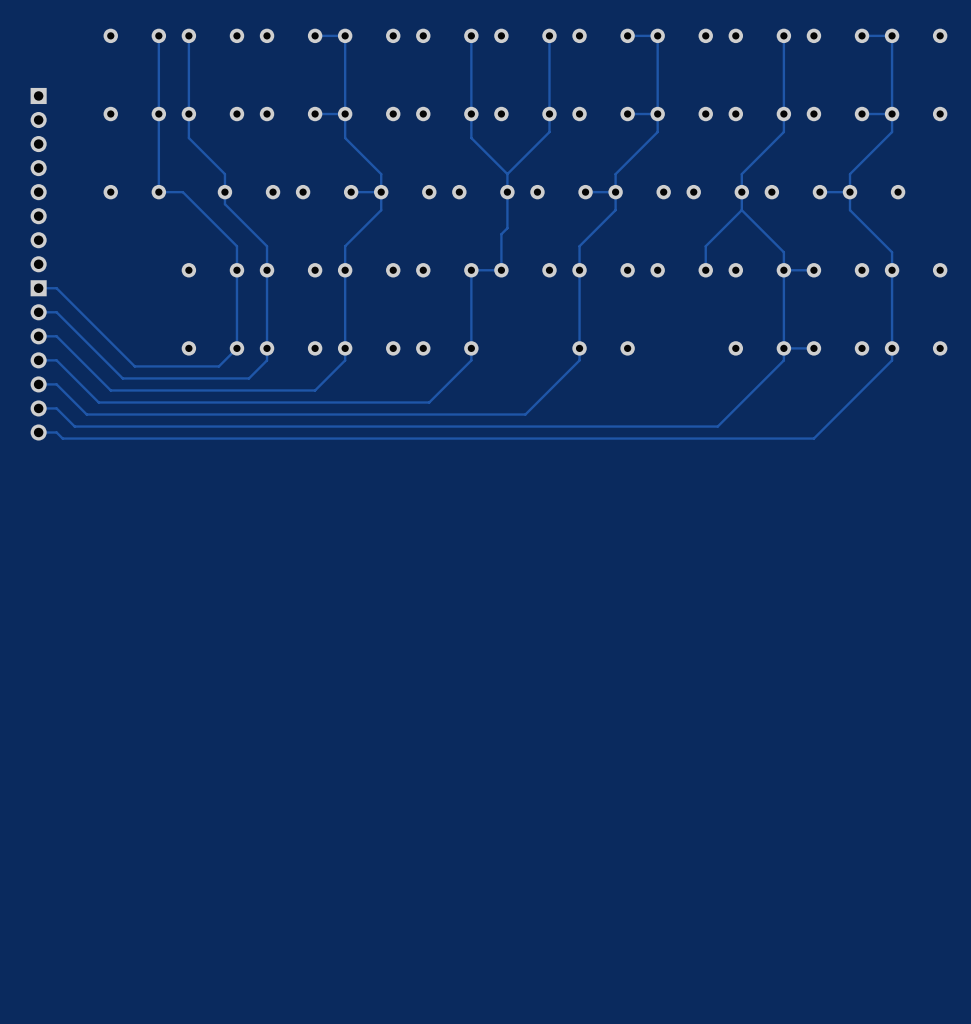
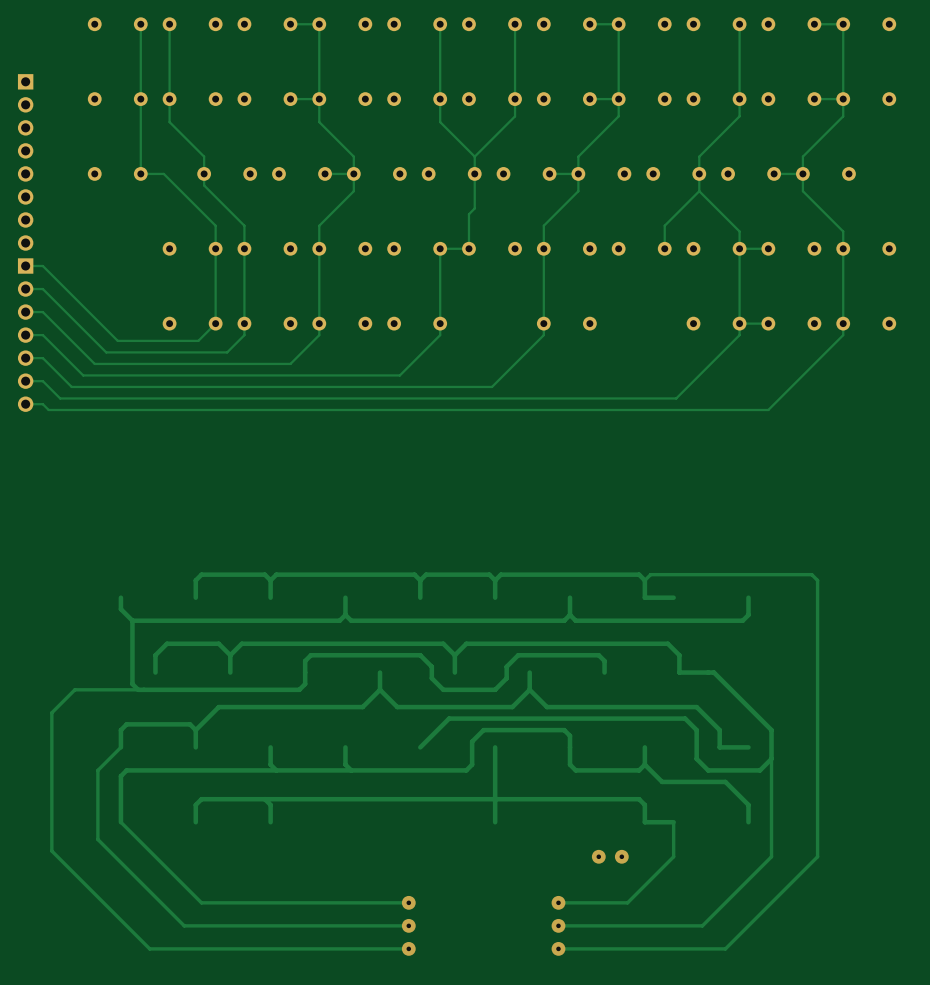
track: none -> (270, 580) (264, 574) (201, 574) (195, 580) (195, 597)
track: none -> (270, 580) (270, 597)
track: none -> (420, 580) (420, 597)
track: none -> (420, 580) (414, 574) (276, 574) (270, 580)
track: none -> (495, 580) (495, 597)
track: none -> (495, 580) (489, 574) (426, 574) (420, 580)
track: none -> (644, 580) (639, 574) (500, 574) (495, 580)
track: none -> (644, 580) (644, 597) (673, 597)
track: none -> (644, 580) (650, 574) (811, 574) (817, 580) (817, 856) (725, 948) (558, 948)
track: none -> (120, 597) (120, 609) (132, 620)
track: none -> (345, 597) (345, 614)
track: none -> (570, 597) (570, 614)
track: none -> (748, 597) (748, 614) (742, 620) (575, 620) (570, 614)
track: none -> (345, 614) (339, 620) (132, 620)
track: none -> (570, 614) (564, 620) (351, 620) (345, 614)
track: none -> (132, 620) (132, 684) (138, 689) (299, 689) (305, 684) (305, 661) (310, 655) (420, 655) (431, 666) (431, 678) (443, 689) (495, 689) (506, 678) (506, 666) (518, 655) (598, 655) (604, 661) (604, 672)
track: none -> (230, 655) (218, 643) (166, 643) (155, 655) (155, 672)
track: none -> (230, 655) (230, 672)
track: none -> (454, 655) (454, 672)
track: none -> (454, 655) (466, 643) (667, 643) (679, 655) (679, 672) (713, 672) (771, 730) (771, 758)
track: none -> (454, 655) (443, 643) (241, 643) (230, 655)
track: none -> (380, 672) (380, 689)
track: none -> (529, 672) (529, 689)
track: none -> (143, 689) (74, 689) (51, 712) (51, 851) (149, 948) (408, 948)
track: none -> (380, 689) (362, 707) (218, 707) (195, 730)
track: none -> (529, 689) (546, 707) (696, 707) (719, 730) (719, 747) (748, 747)
track: none -> (529, 689) (512, 707) (397, 707) (380, 689)
track: none -> (195, 730) (195, 747)
track: none -> (195, 730) (190, 724) (126, 724) (120, 730) (120, 747) (97, 770) (97, 839) (184, 925) (408, 925)
track: none -> (270, 747) (270, 764) (276, 770)
track: none -> (345, 747) (345, 764) (351, 770)
track: none -> (420, 747) (449, 718) (685, 718) (696, 730) (696, 758) (708, 770) (760, 770) (771, 758)
track: none -> (495, 747) (495, 822)
track: none -> (644, 747) (644, 764)
track: none -> (771, 758) (771, 856) (702, 925) (558, 925)
track: none -> (644, 764) (639, 770) (575, 770) (570, 764) (570, 735) (564, 730) (483, 730) (472, 741) (472, 764) (466, 770) (126, 770) (120, 776) (120, 822) (201, 902) (408, 902)
track: none -> (644, 764) (662, 781) (725, 781) (748, 804) (748, 822)
track: none -> (264, 799) (270, 804) (270, 822)
track: none -> (195, 822) (195, 804) (201, 799) (639, 799) (644, 804) (644, 822) (673, 822) (673, 856) (627, 902) (558, 902)
via: none -> (598, 856)
via: none -> (621, 856)
via: none -> (408, 902)
via: none -> (558, 902)
via: none -> (408, 925)
via: none -> (558, 925)
via: none -> (408, 948)
via: none -> (558, 948)

